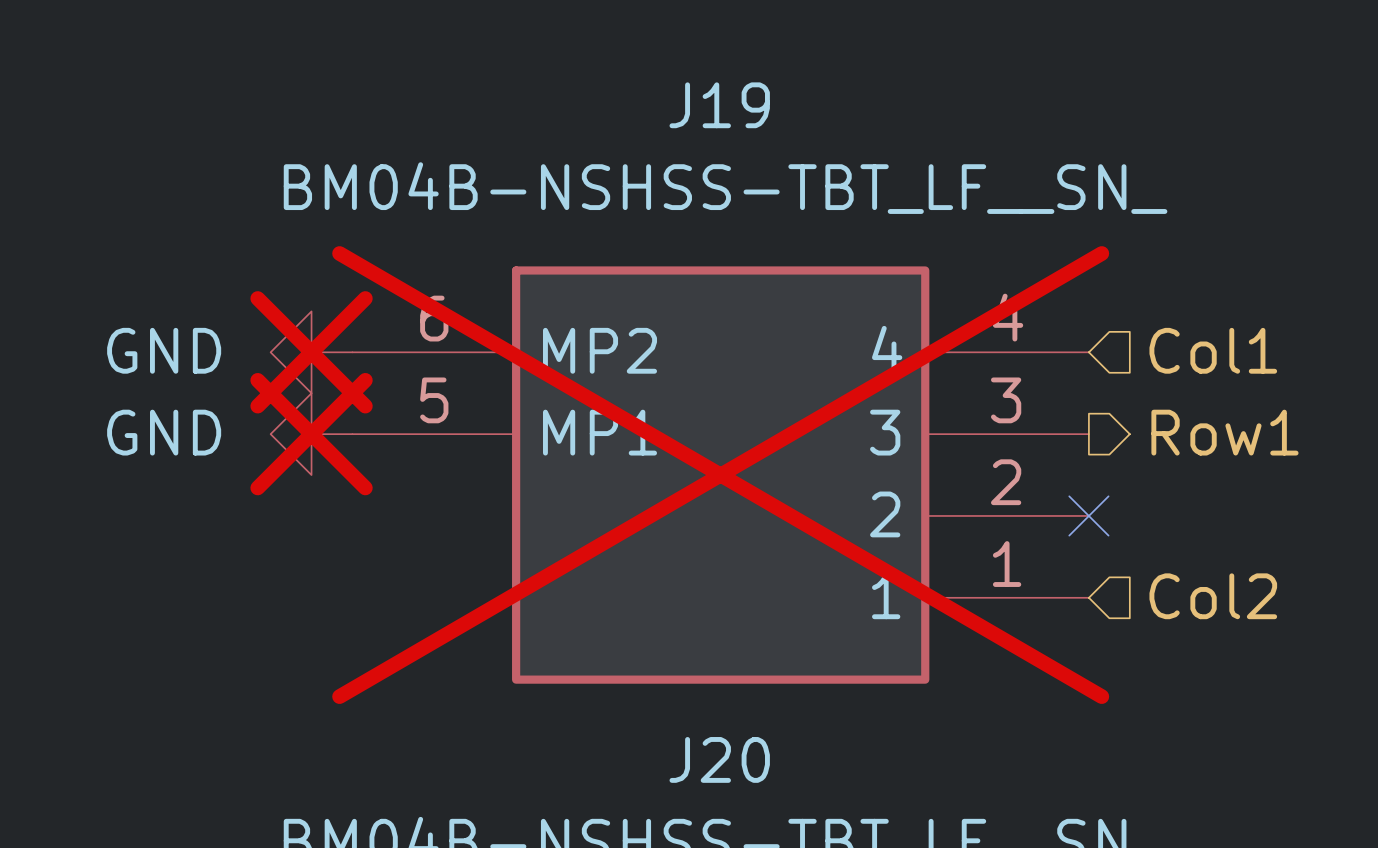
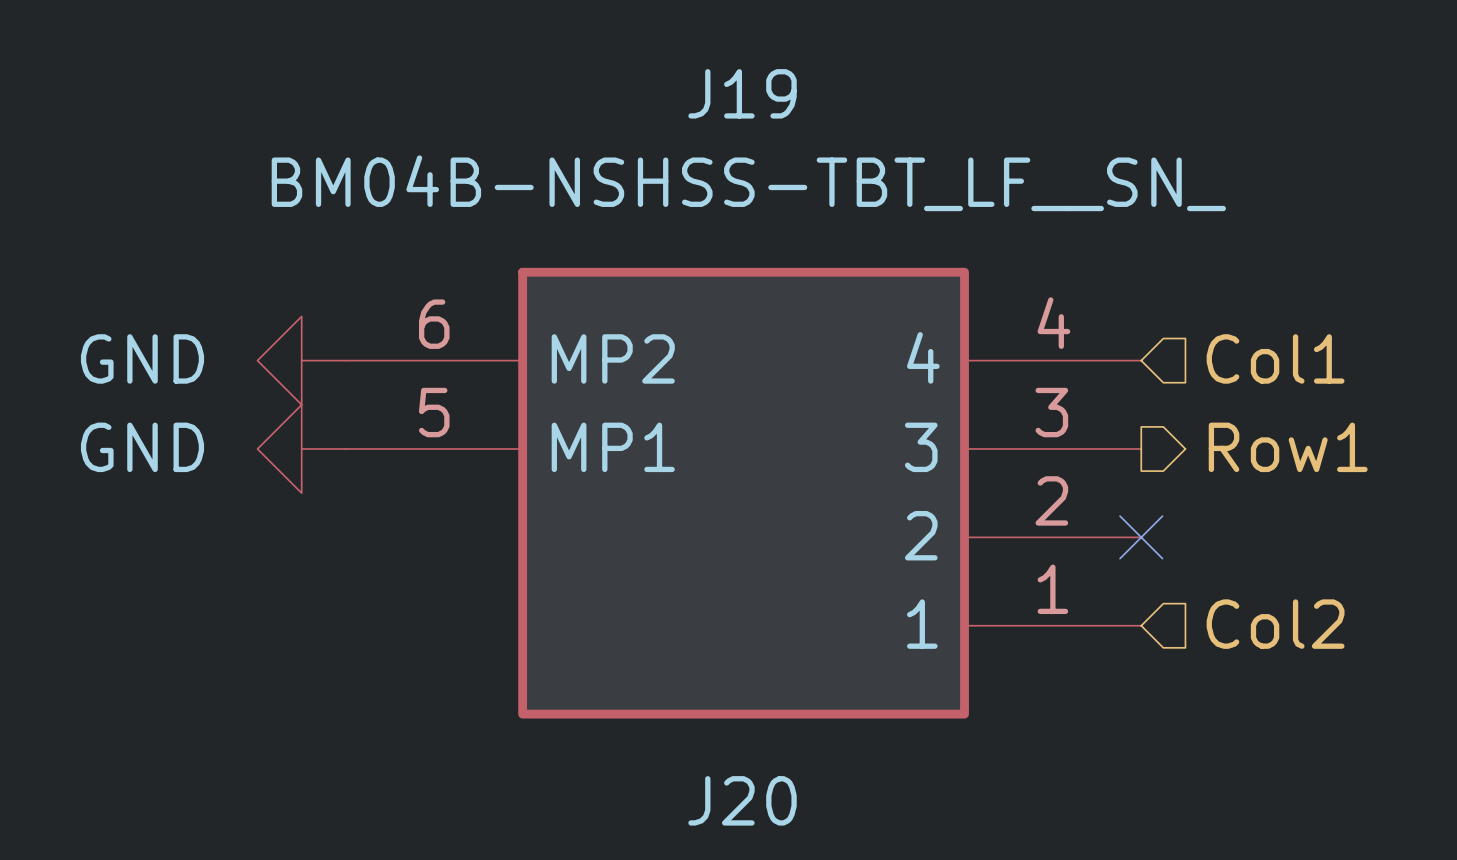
power symbol do-not-place cross: (311, 352) -> none
power symbol do-not-place cross: (311, 434) -> none
J19 do-not-place cross: (720, 475) -> none

